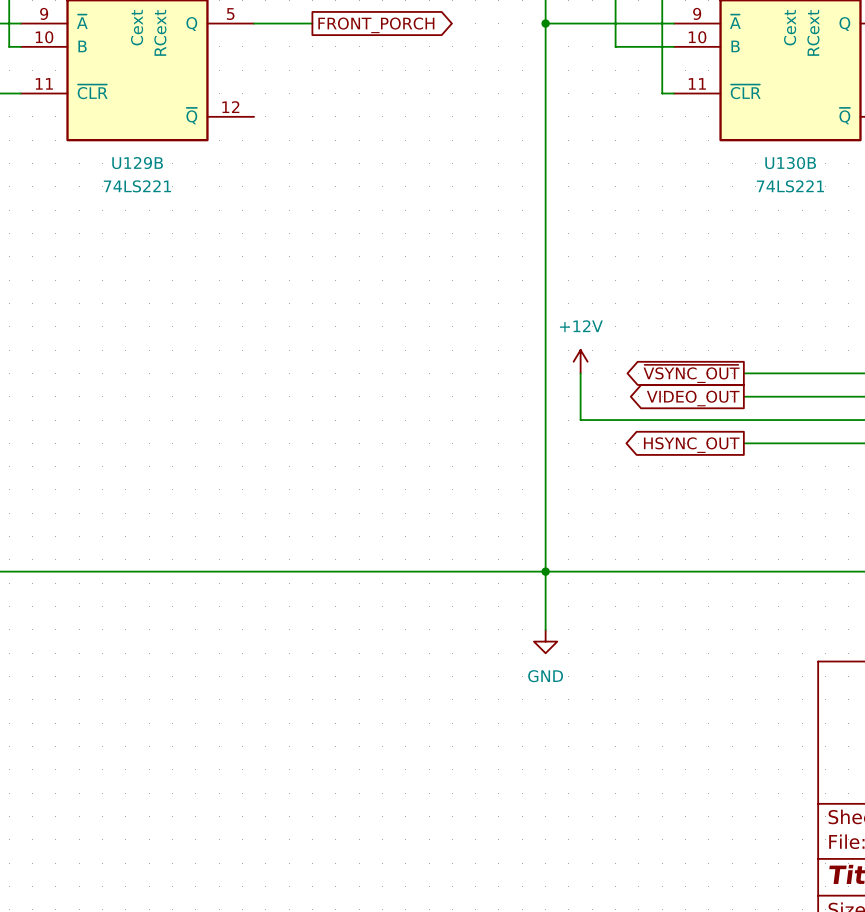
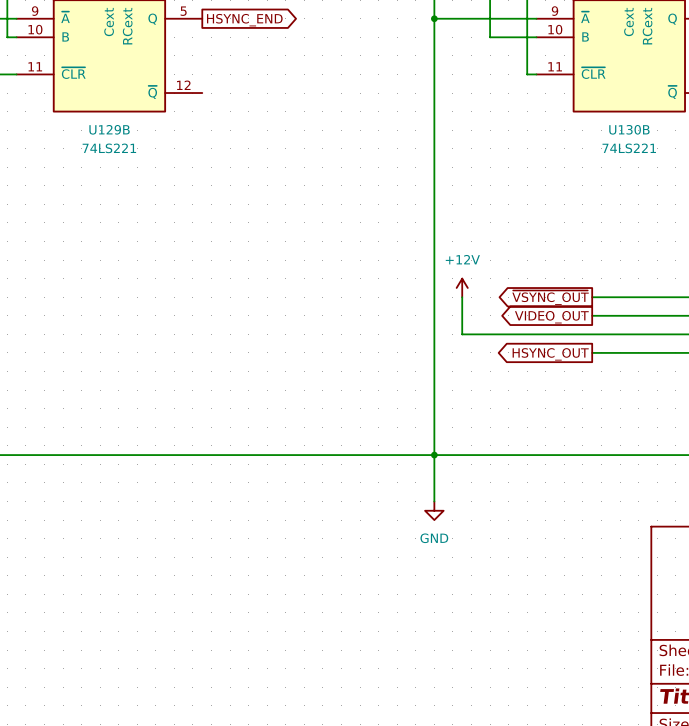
wire: (254, 23) (312, 23) -> none
global label: none -> HSYNC_END (244, 20)
global label: FRONT_PORCH (376, 25) -> none

